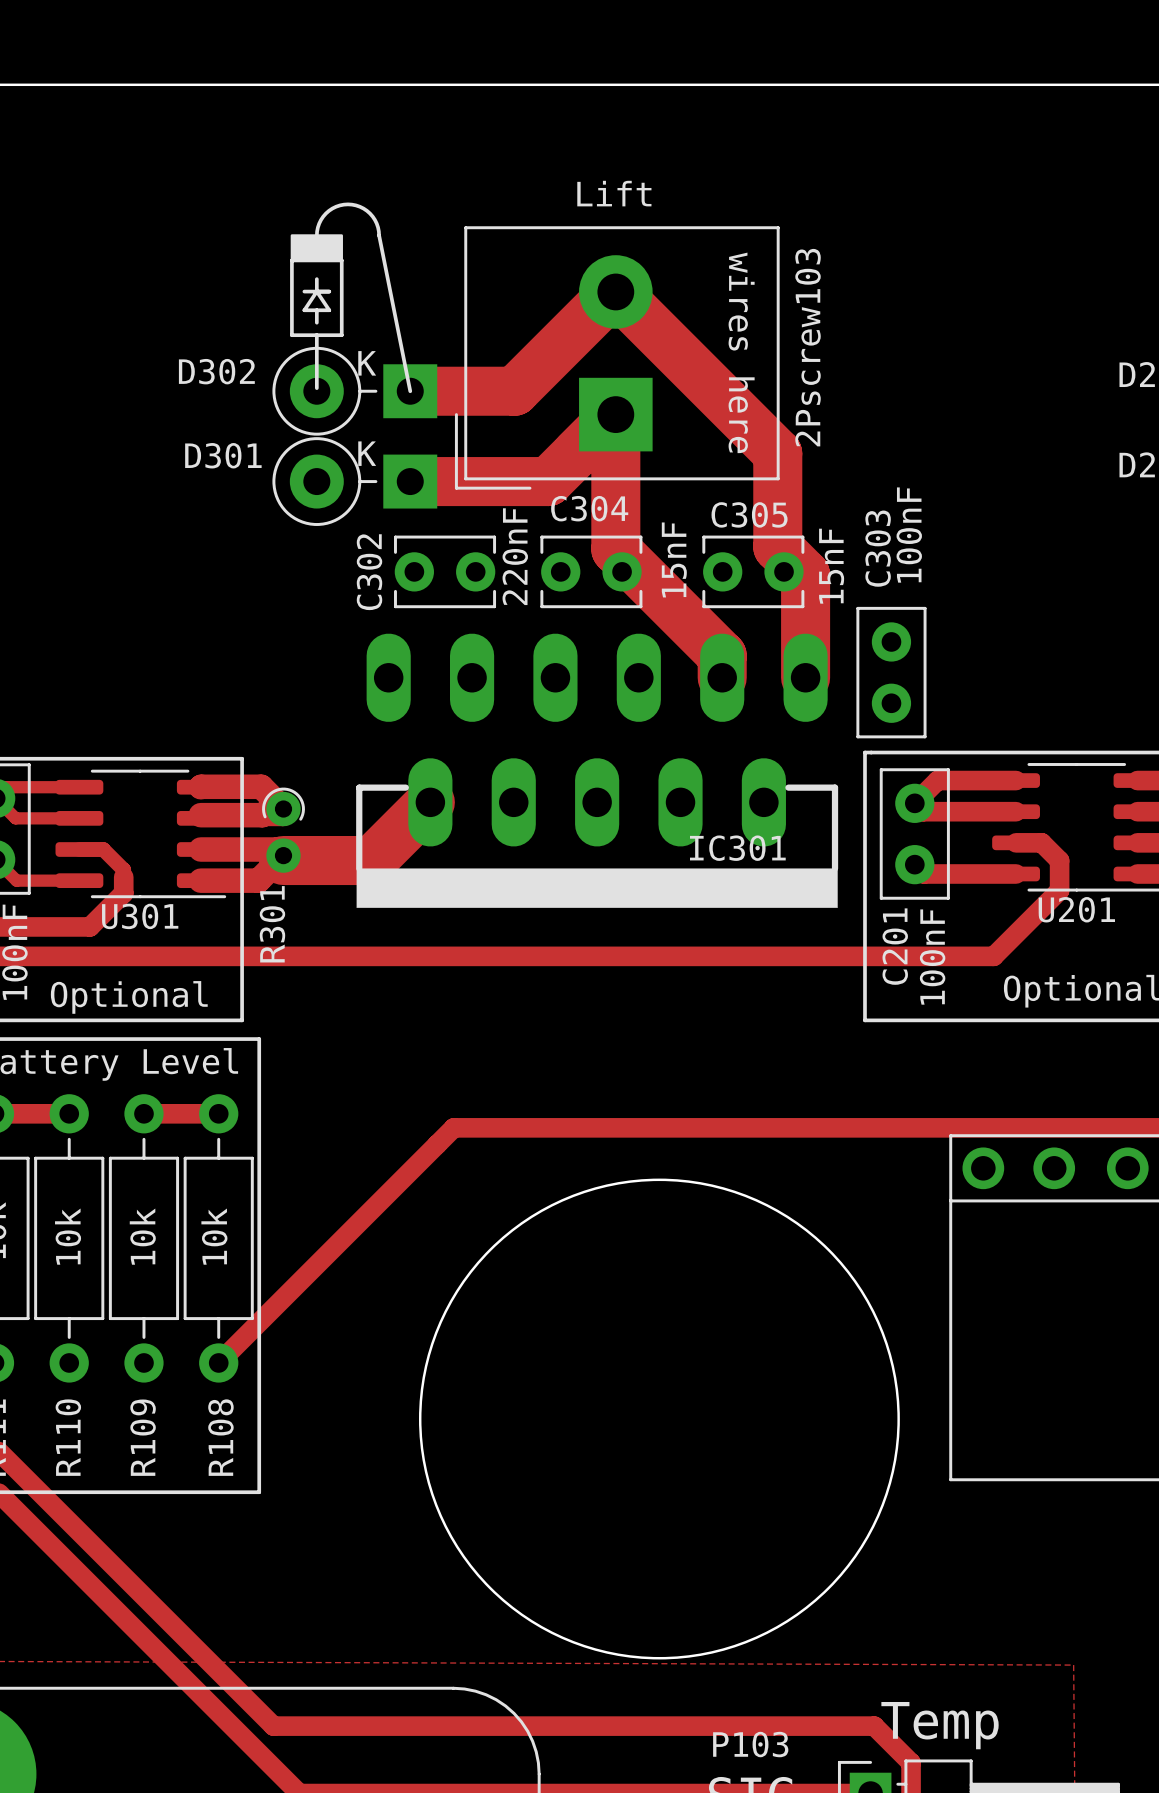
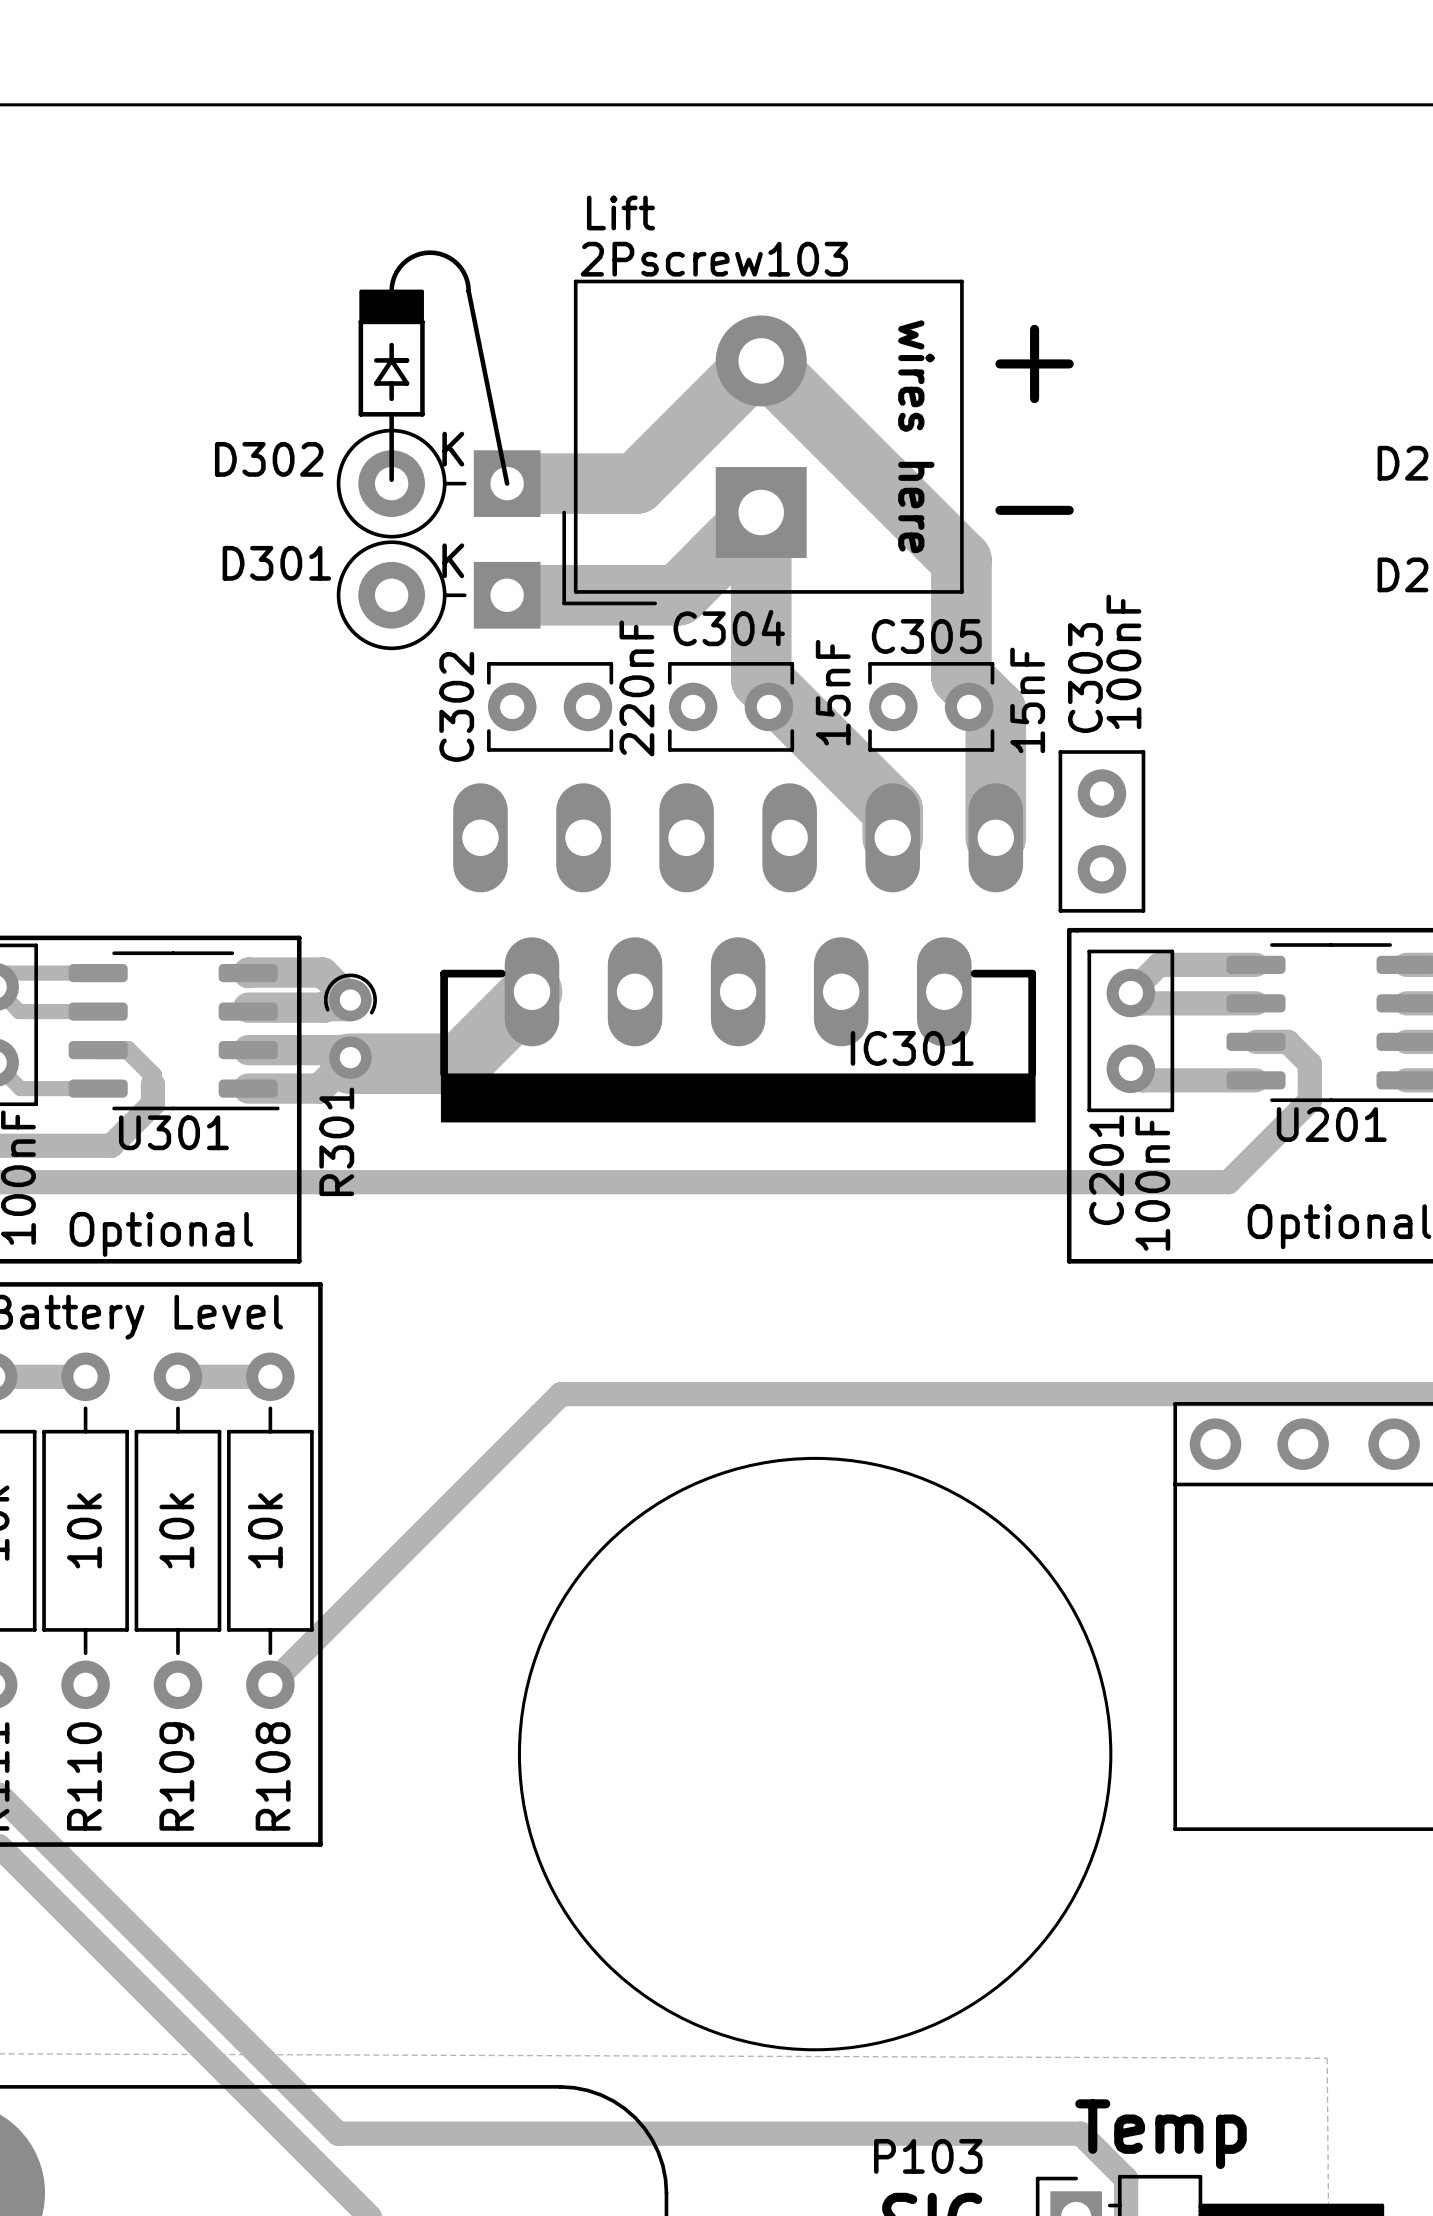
text position: Lift (614, 193) -> Lift (620, 212)
text: none -> + (1034, 363)
2Pscrew103 name rotation: 0° (808, 347) -> 90° clockwise (714, 259)
2Pscrew103 name position: 2Pscrew103 (808, 347) -> 2Pscrew103 (714, 259)
text: none -> - (1034, 510)

